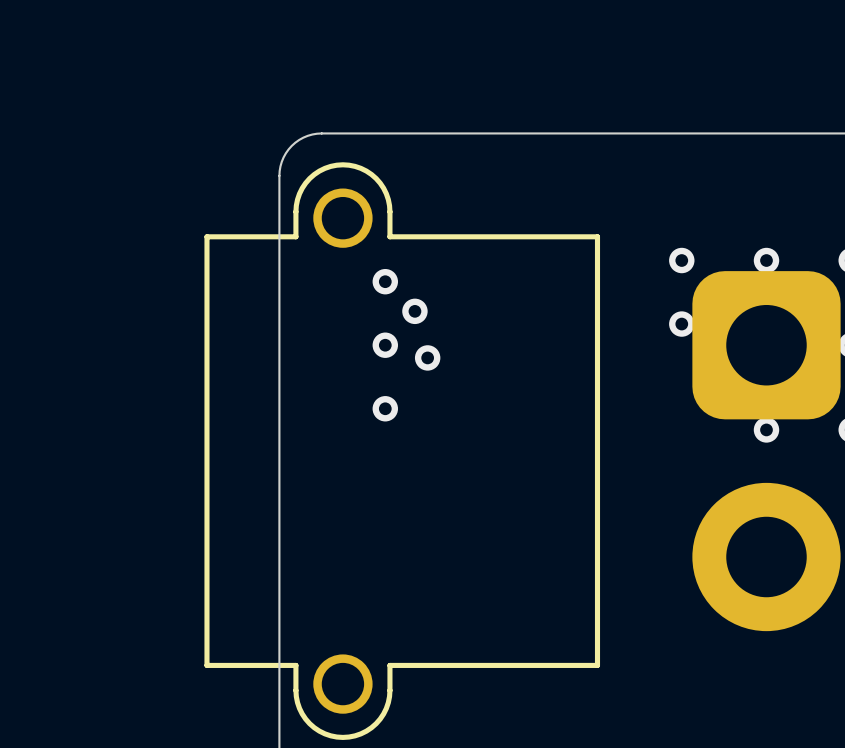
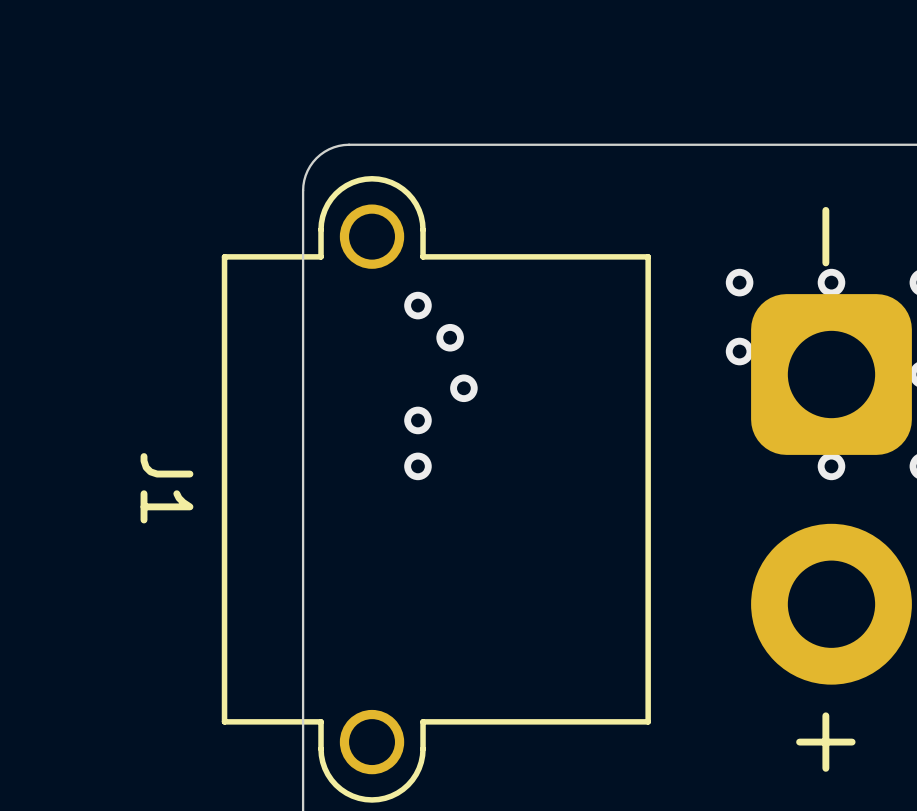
J1 text: none -> - (825, 236)
via: (385, 345) -> none
via: none -> (417, 420)
via: (385, 408) -> none
via: none -> (417, 466)
J1 name: none -> J1 (166, 488)
J1 text: none -> + (825, 742)

